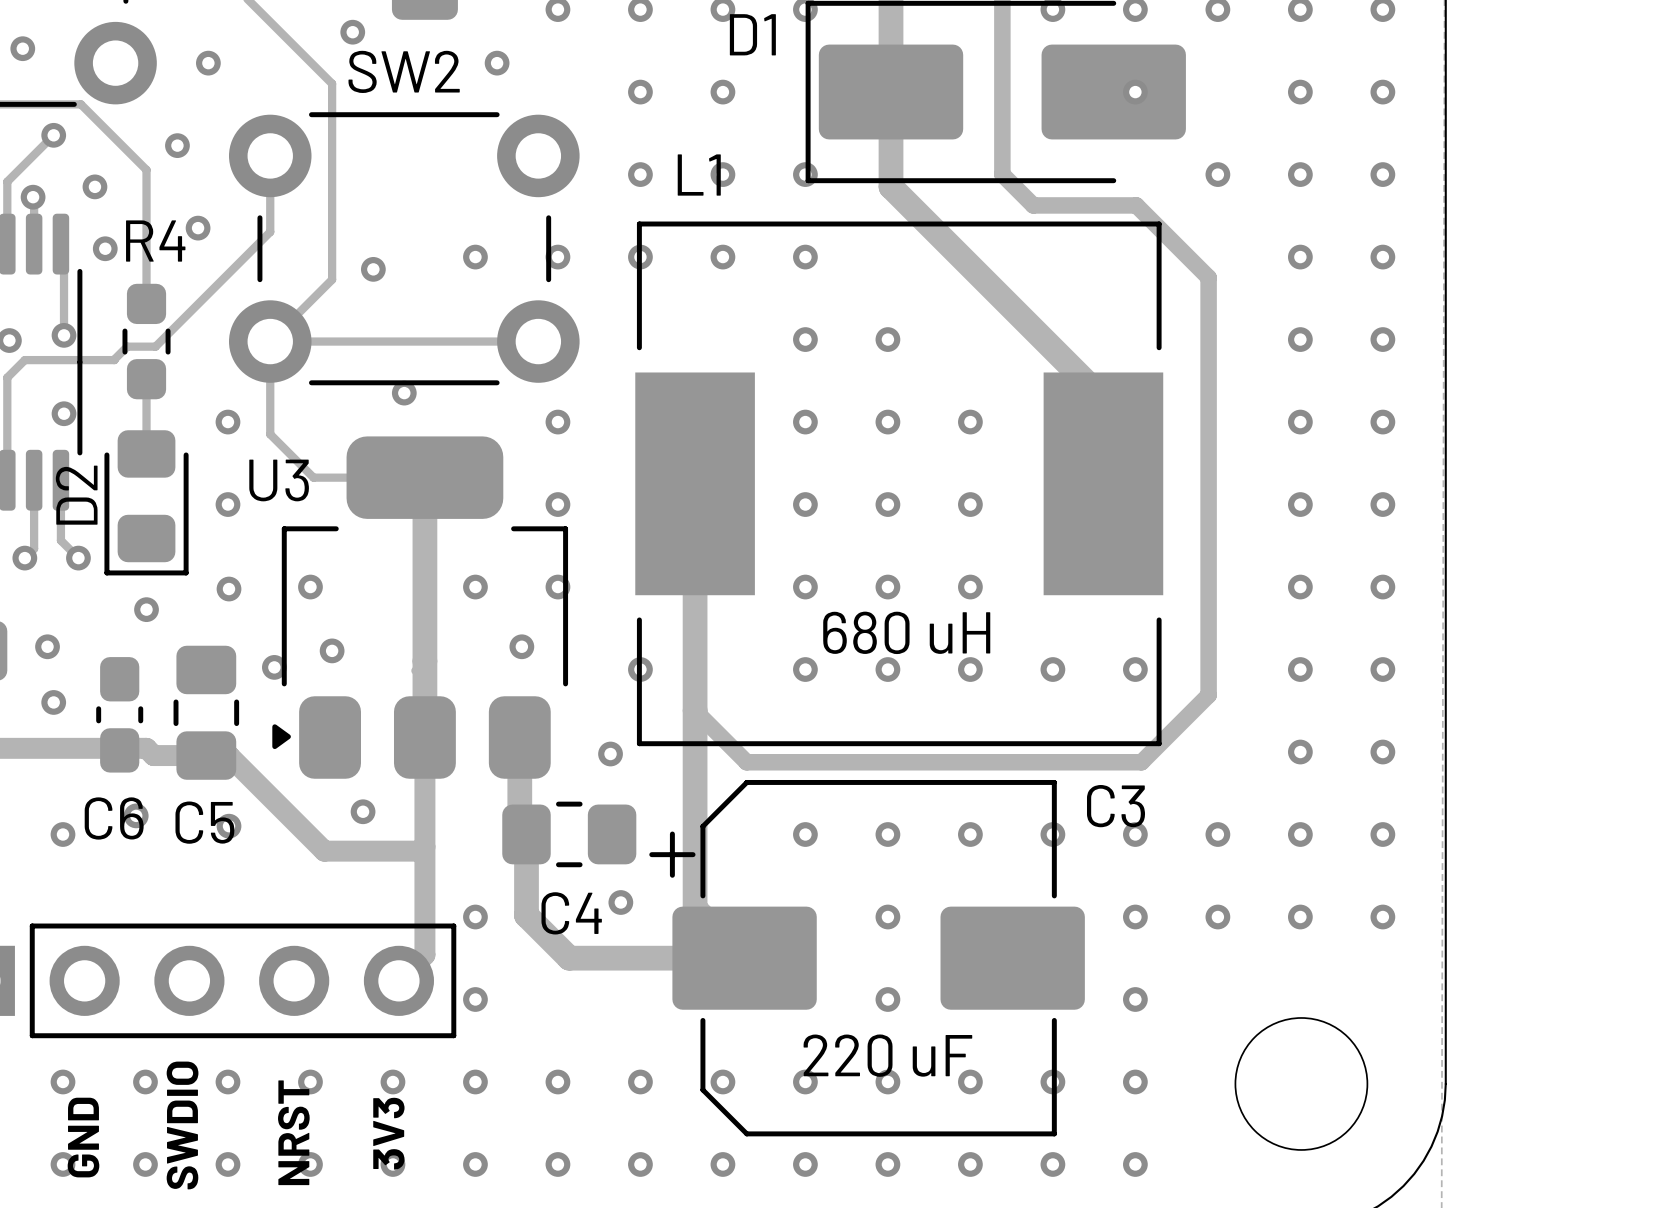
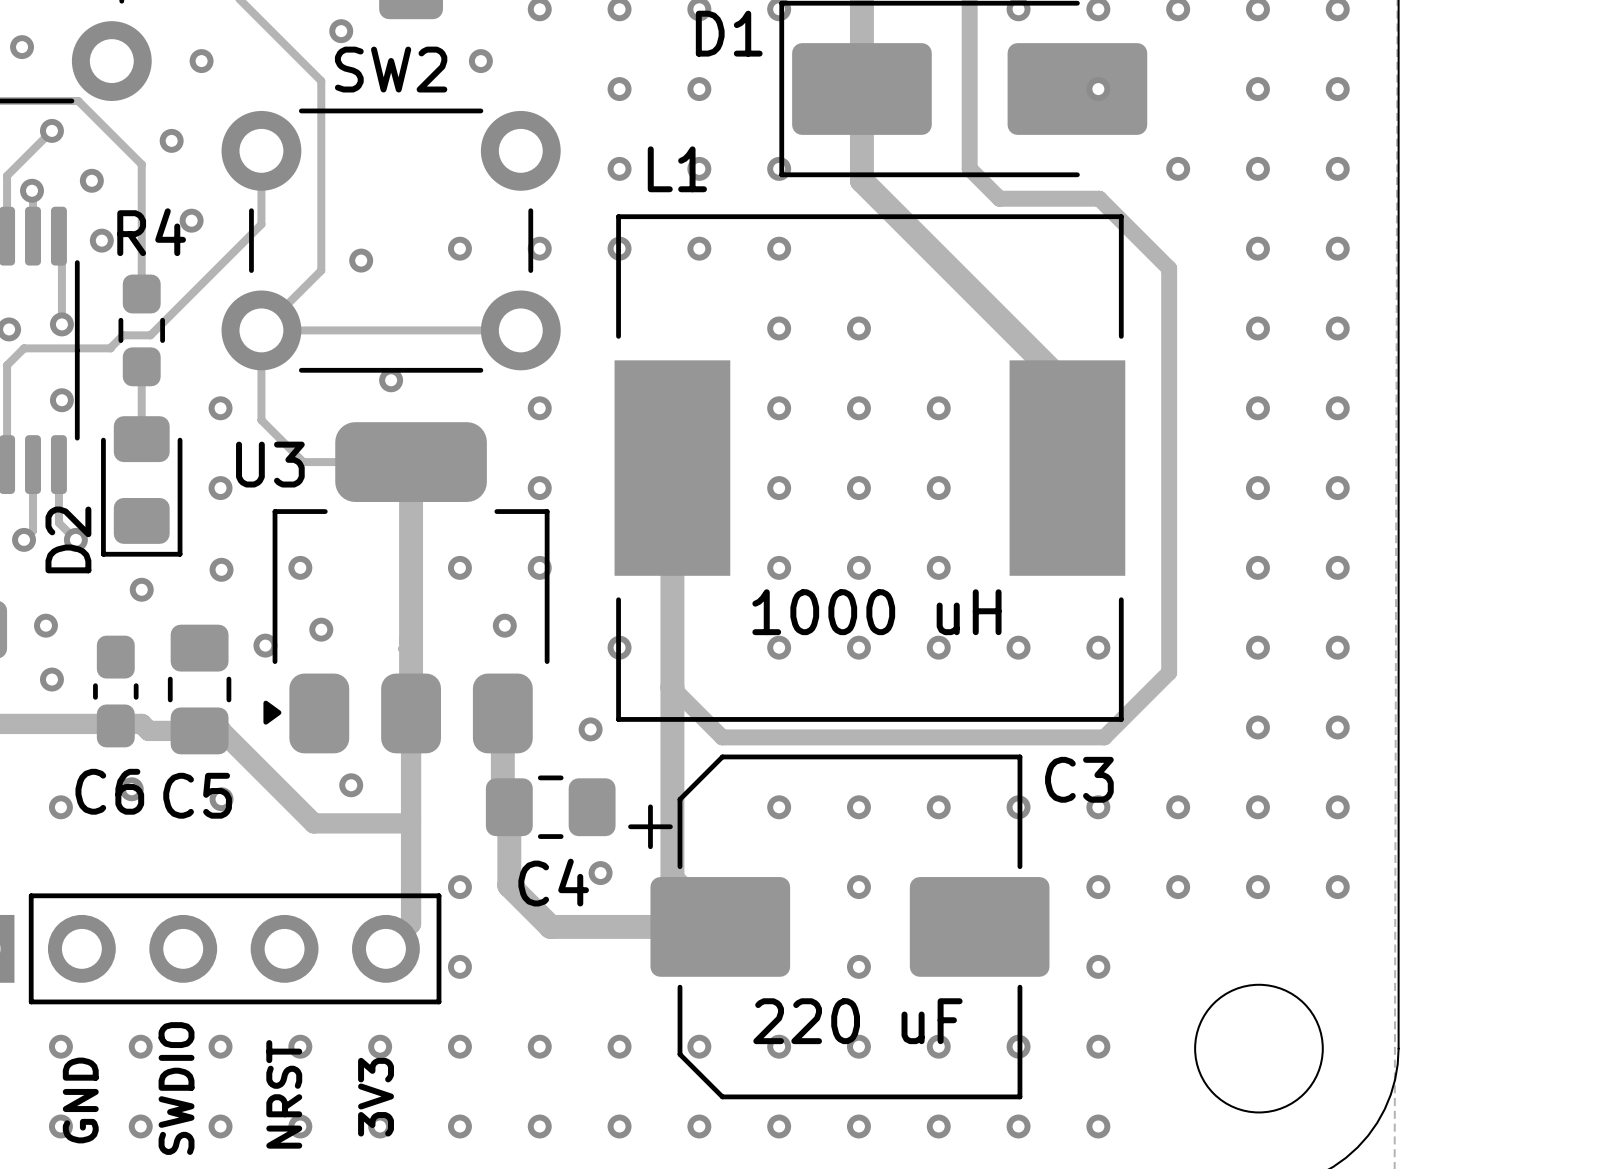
D2 name position: D2 (76, 495) -> D2 (68, 539)
L1 value: 680 uH (906, 632) -> 1000 uH (876, 612)

